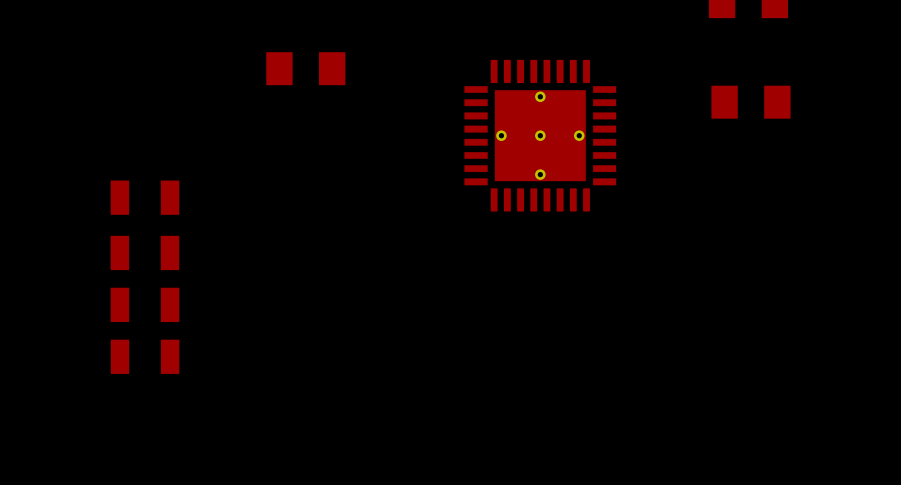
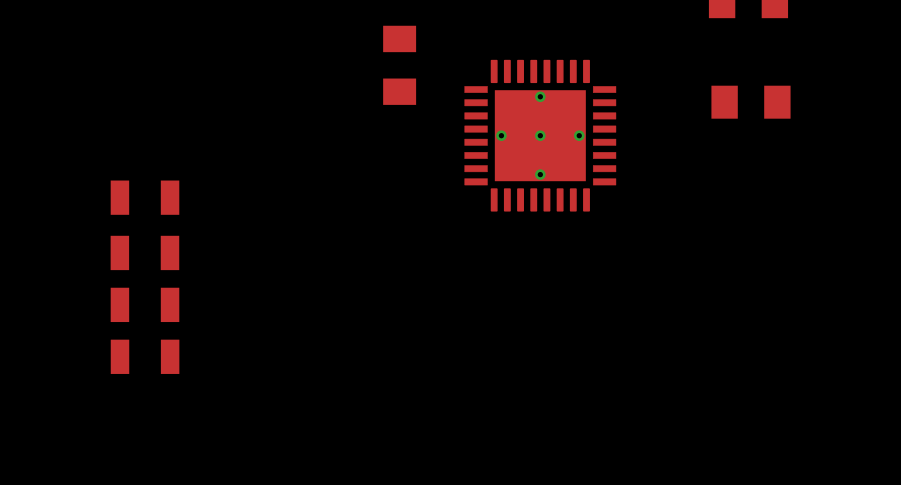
part rotation: 0° (305, 68) -> 90° clockwise (399, 65)
part position: (305, 68) -> (399, 65)

